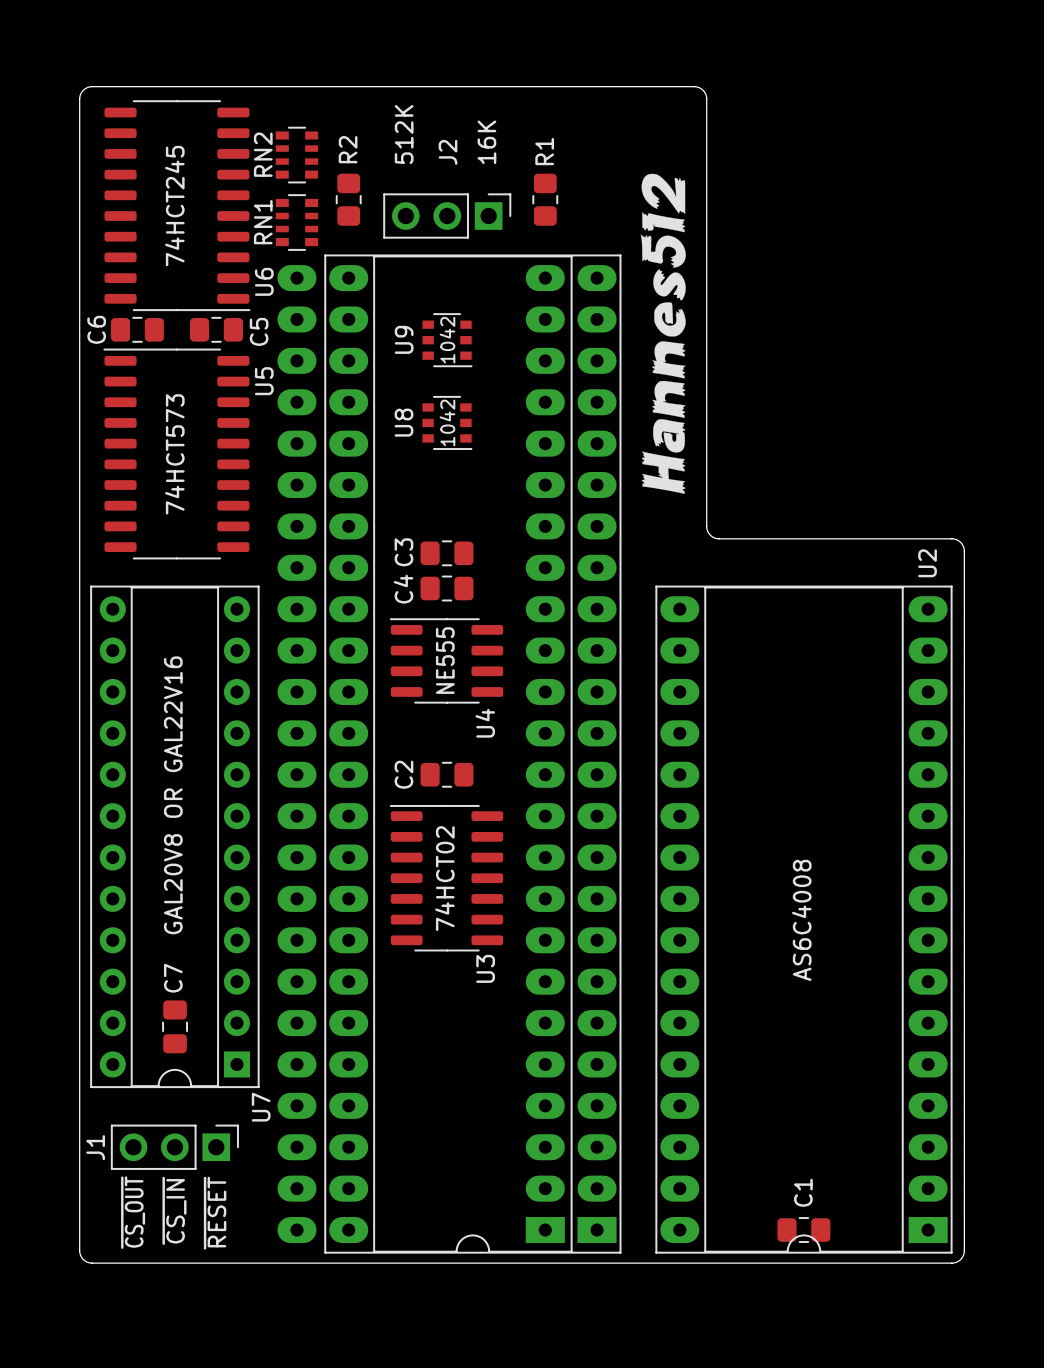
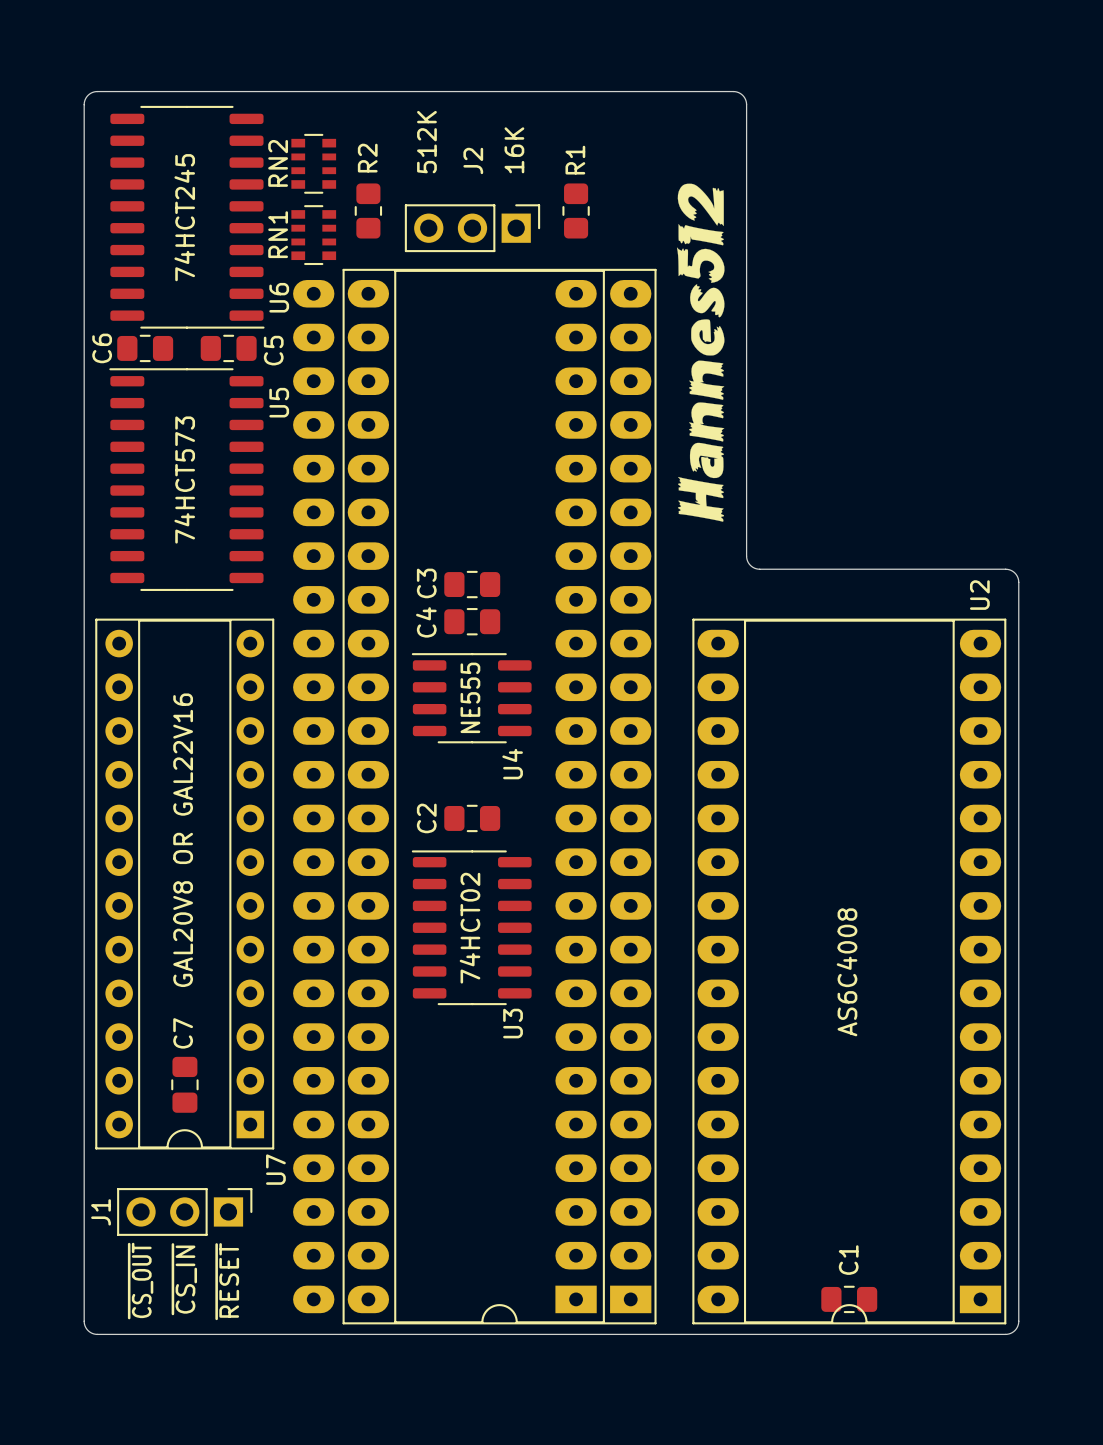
U9: (447, 340) -> none
text: 1042 (447, 340) -> none
U8: (447, 422) -> none
text: 1042 (447, 422) -> none

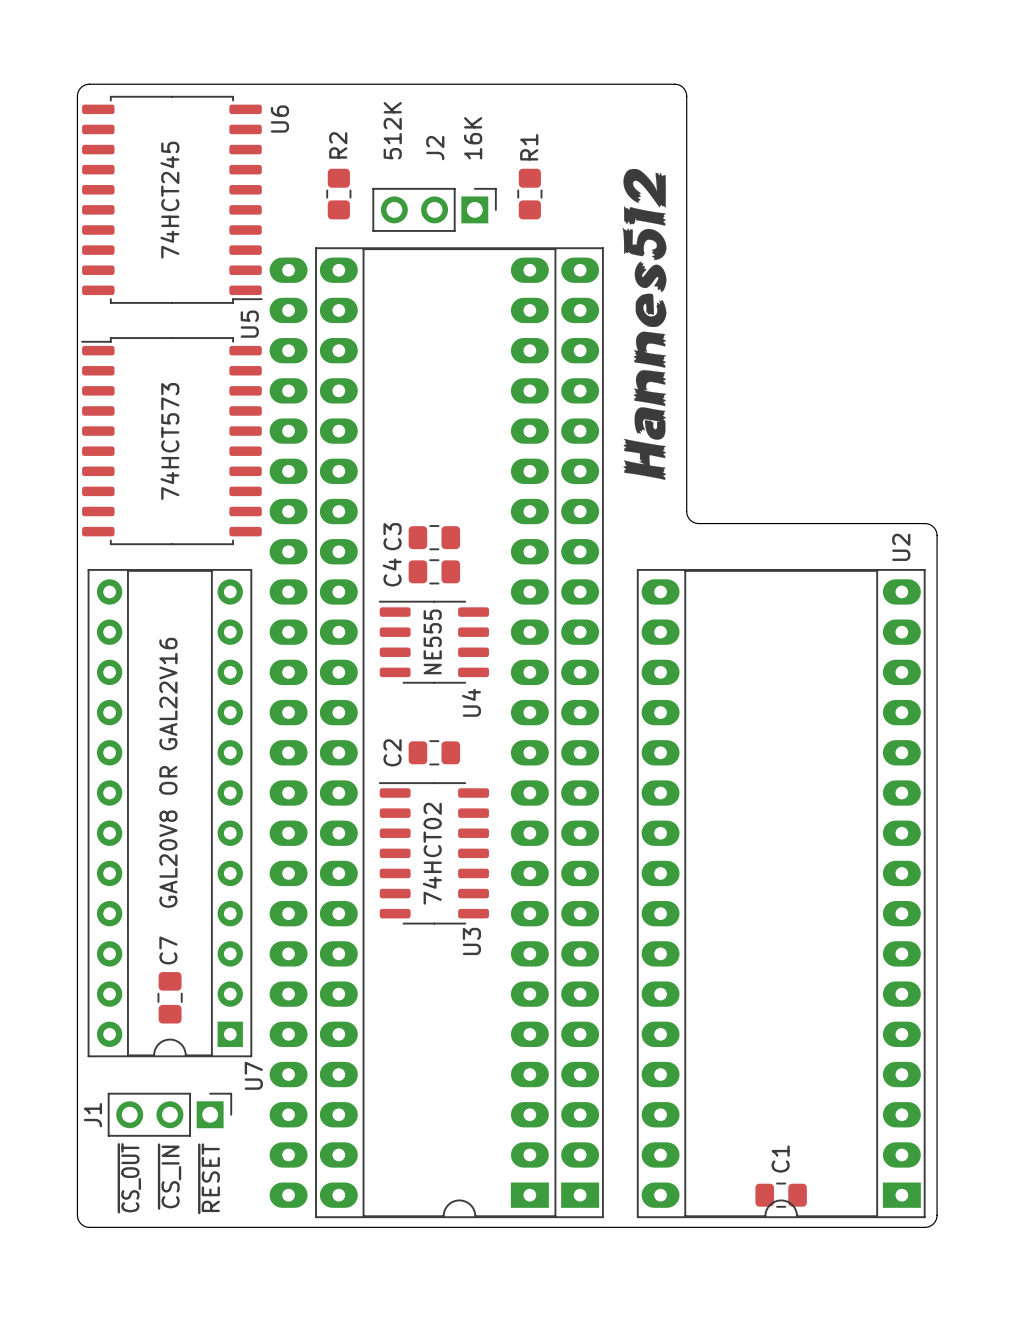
U6 footprint: [110, 105, 265, 329] -> [82, 95, 263, 304]
RN2: (313, 163) -> none
RN1: (313, 235) -> none
U6 name position: U6 (279, 297) -> U6 (279, 119)
C6: (145, 348) -> none
C5: (228, 348) -> none
U5 footprint: [109, 368, 264, 591] -> [81, 337, 262, 546]
U5 name position: U5 (279, 402) -> U5 (249, 324)
U2 value: AS6C4008 (847, 972) -> none

